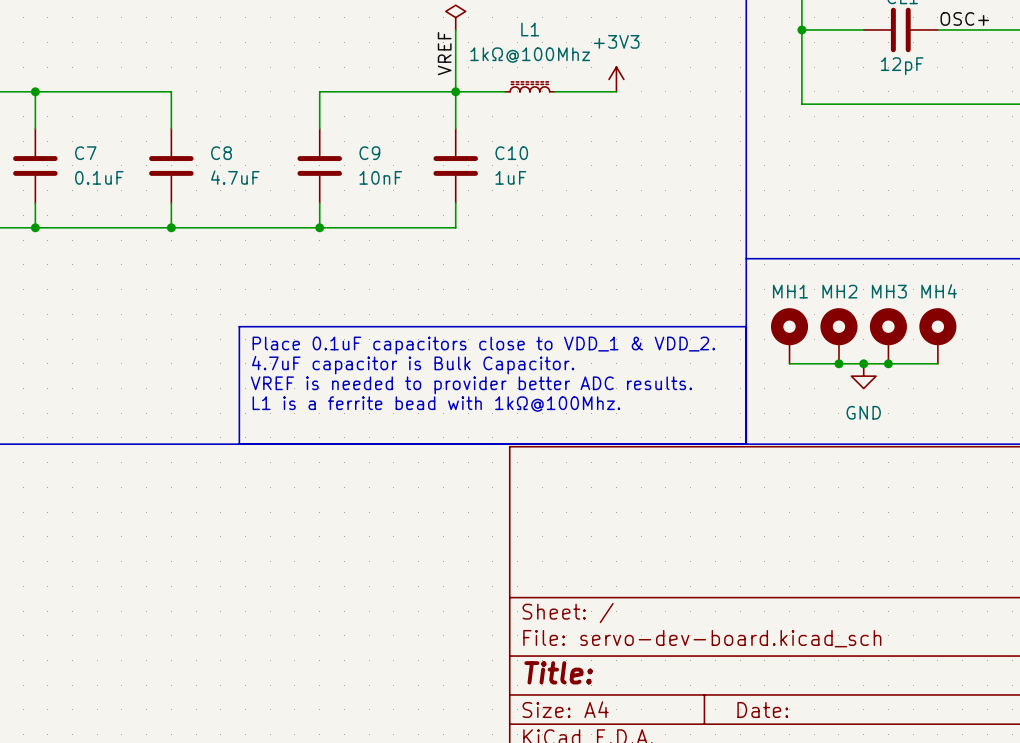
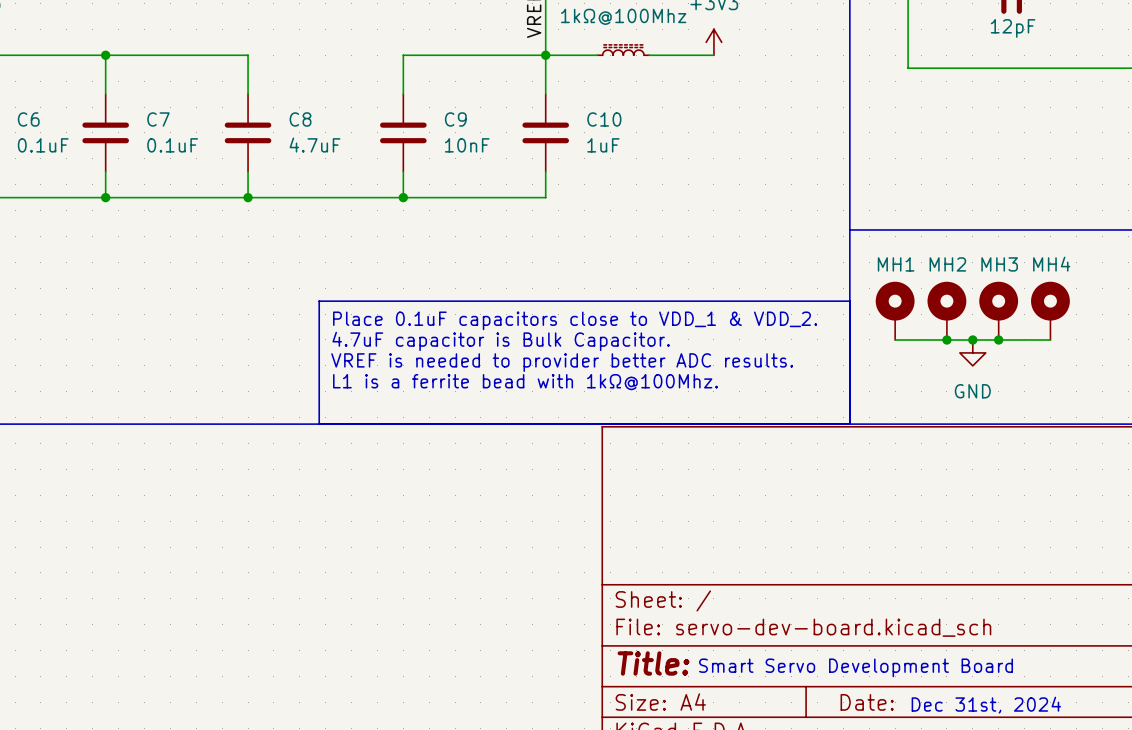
text: none -> Smart Servo Development Board (856, 667)
text: none -> Dec 31st, 2024 (986, 705)

